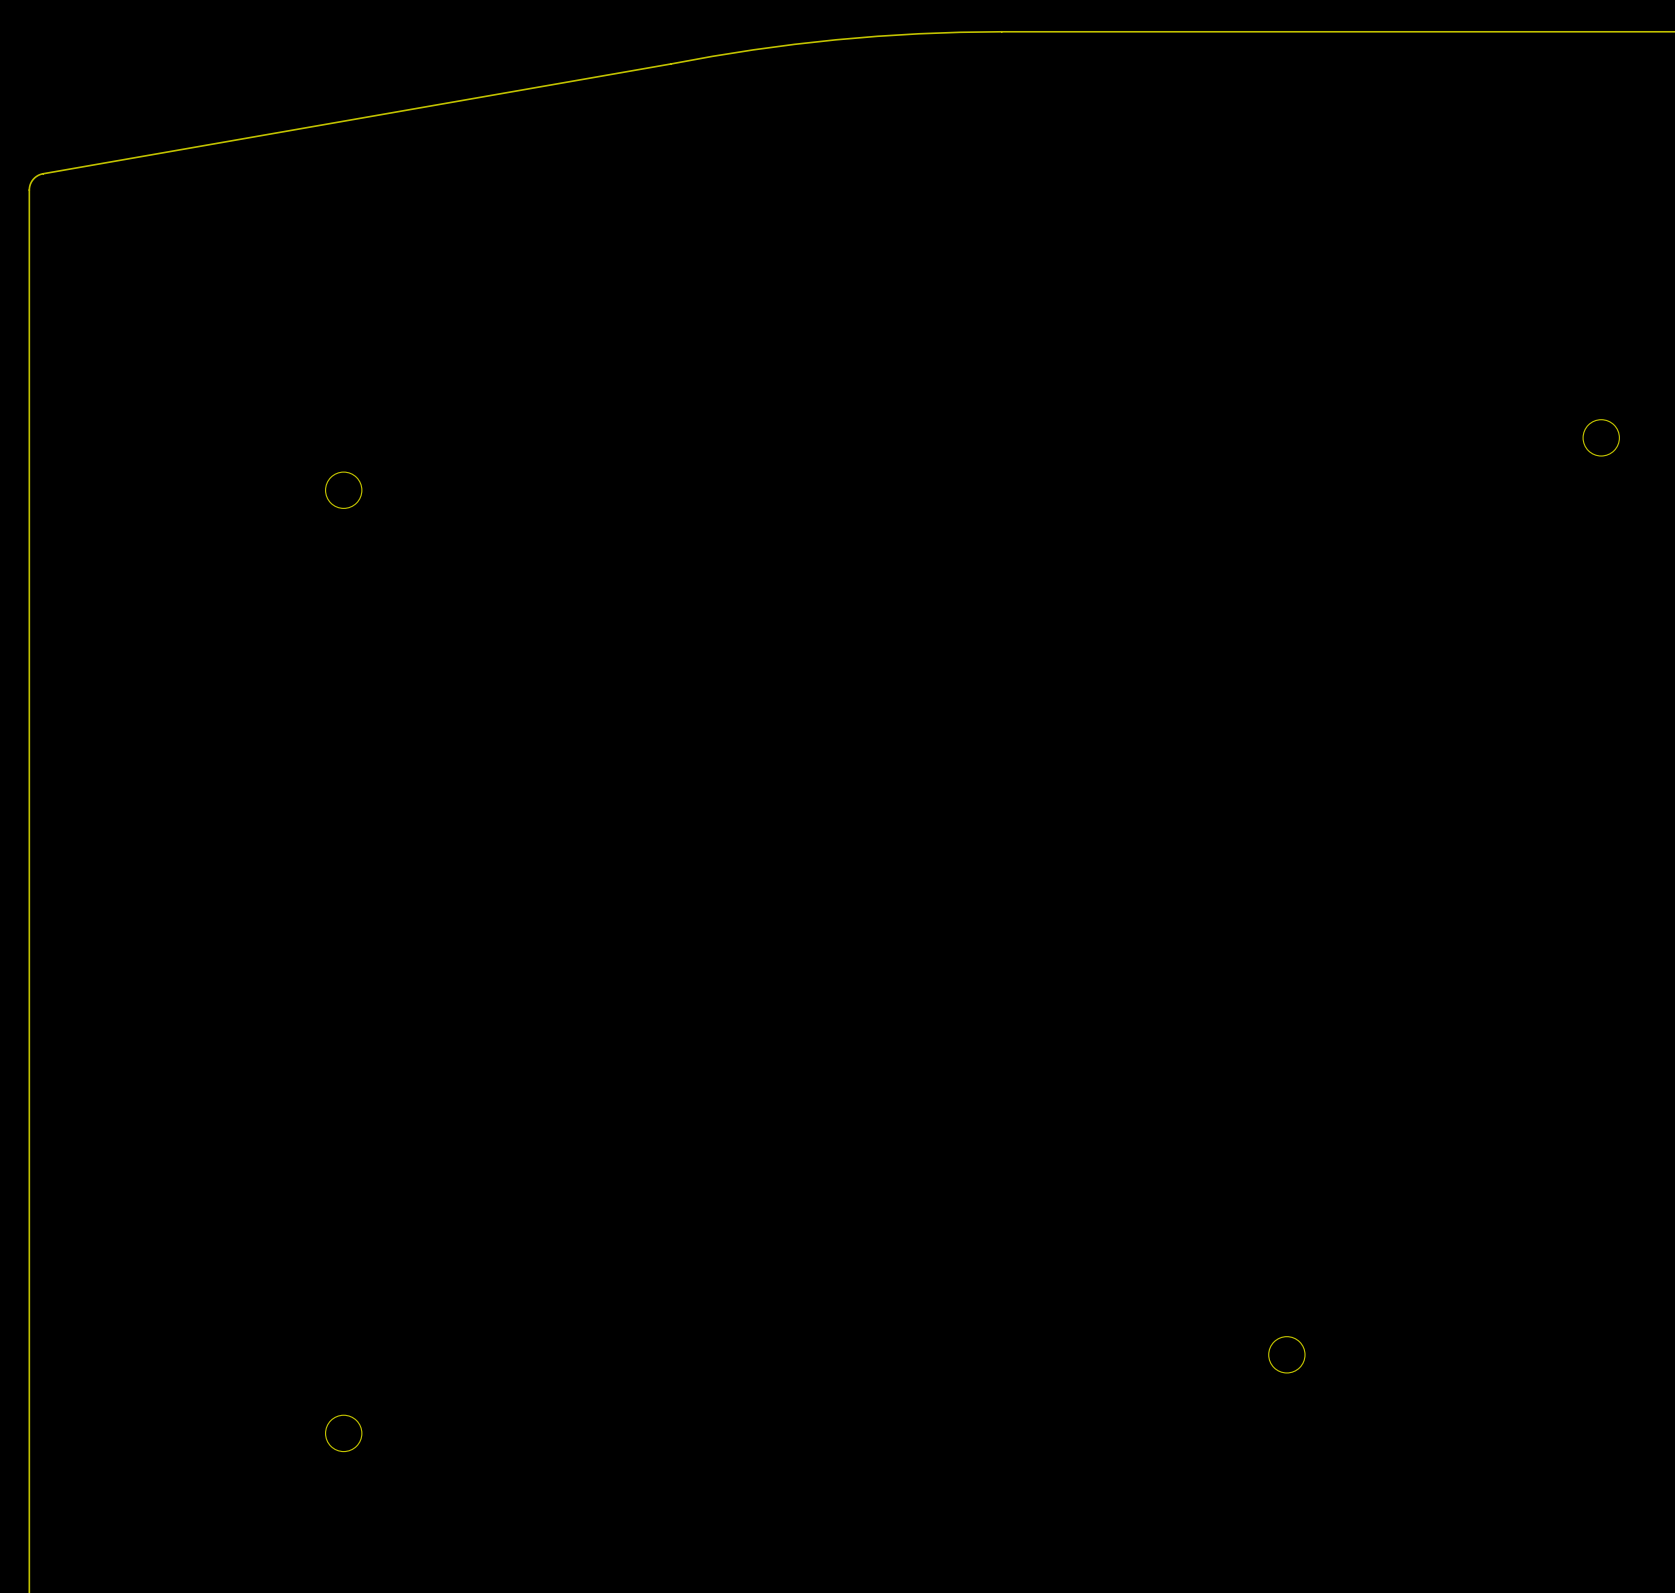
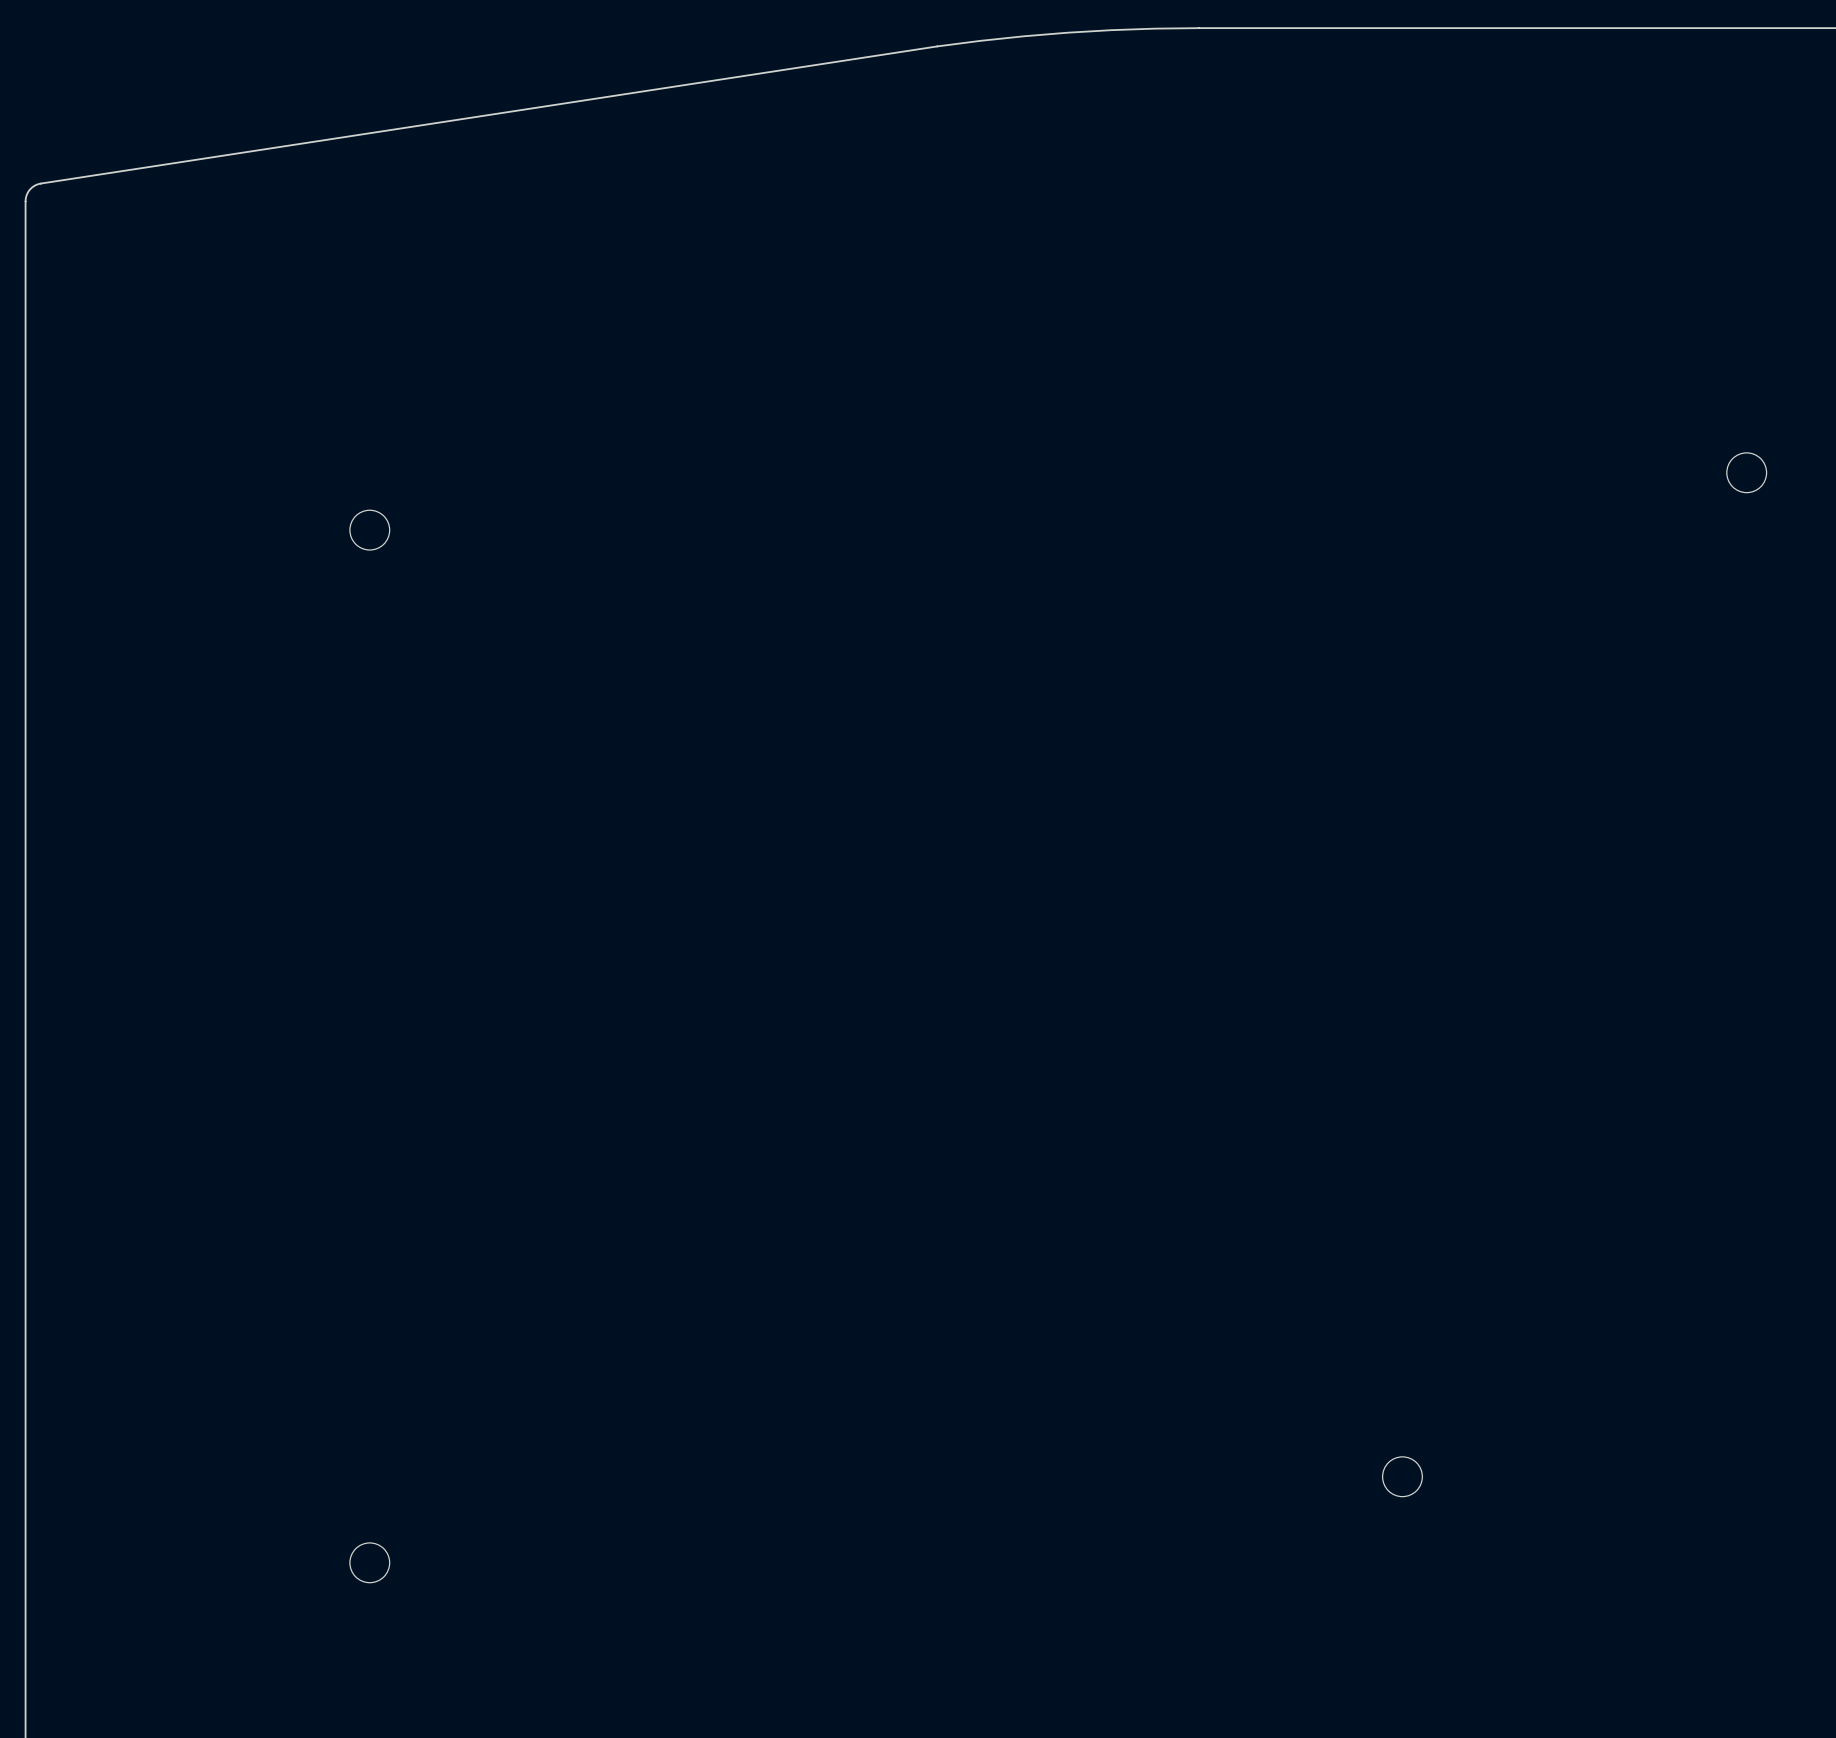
board edge: (1100, 31) (918, 33) (835, 39) (753, 49) (43, 173) -> (1198, 28) (1067, 32) (937, 46) (40, 183)

